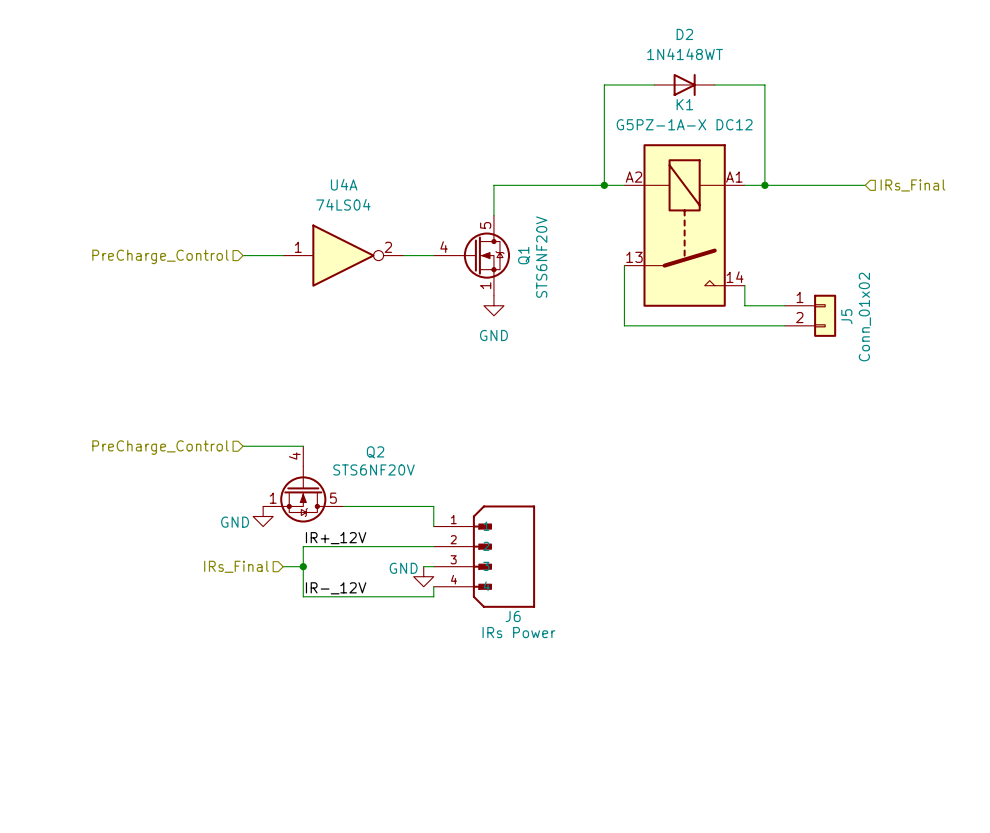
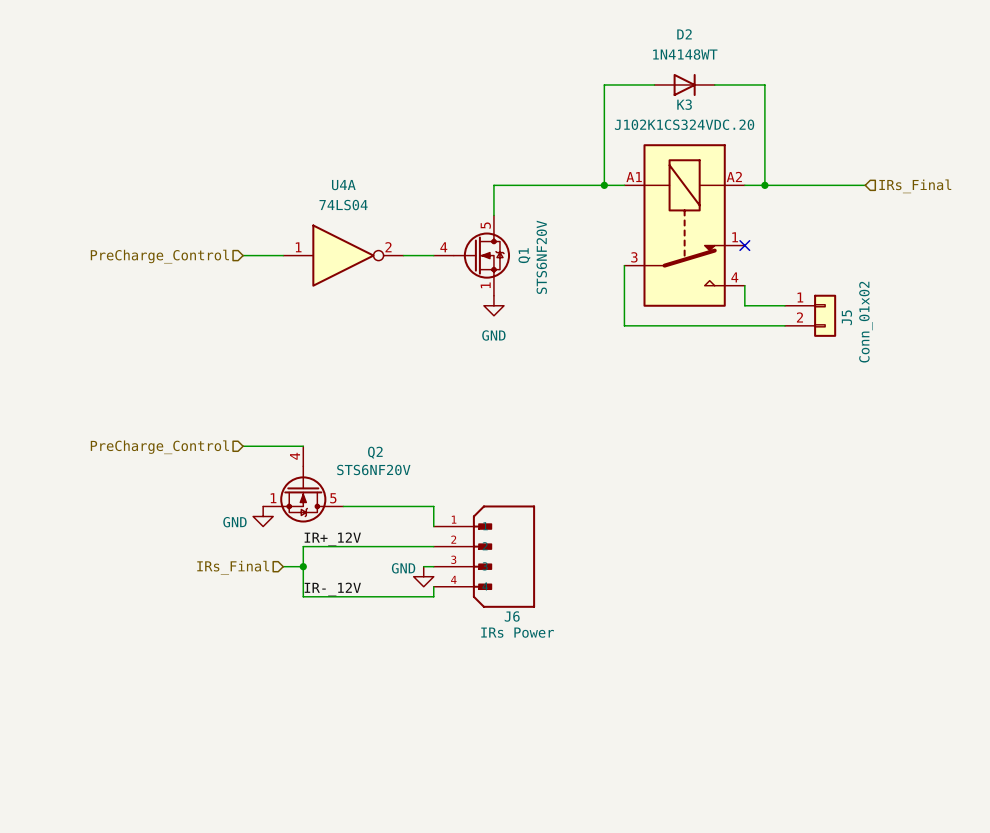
K1: G5PZ-1A-X DC12 (684, 225) -> none
K3: none -> J102K1CS324VDC.20 (684, 225)
no-connect mark: none -> (744, 245)

